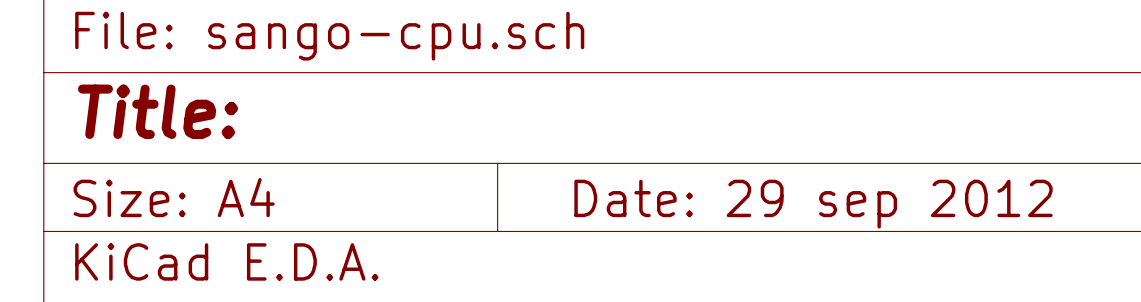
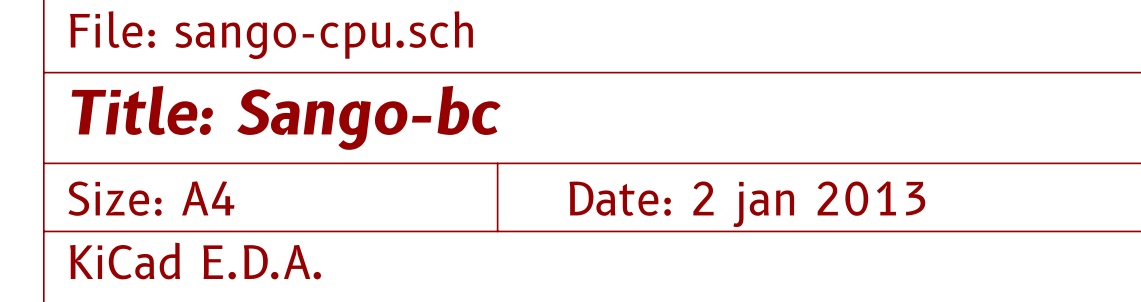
title block: Title: (157, 111) -> Title: Sango-bc (286, 117)
title block: Date: 29 sep 2012 (813, 204) -> Date: 2 jan 2013 (747, 204)

